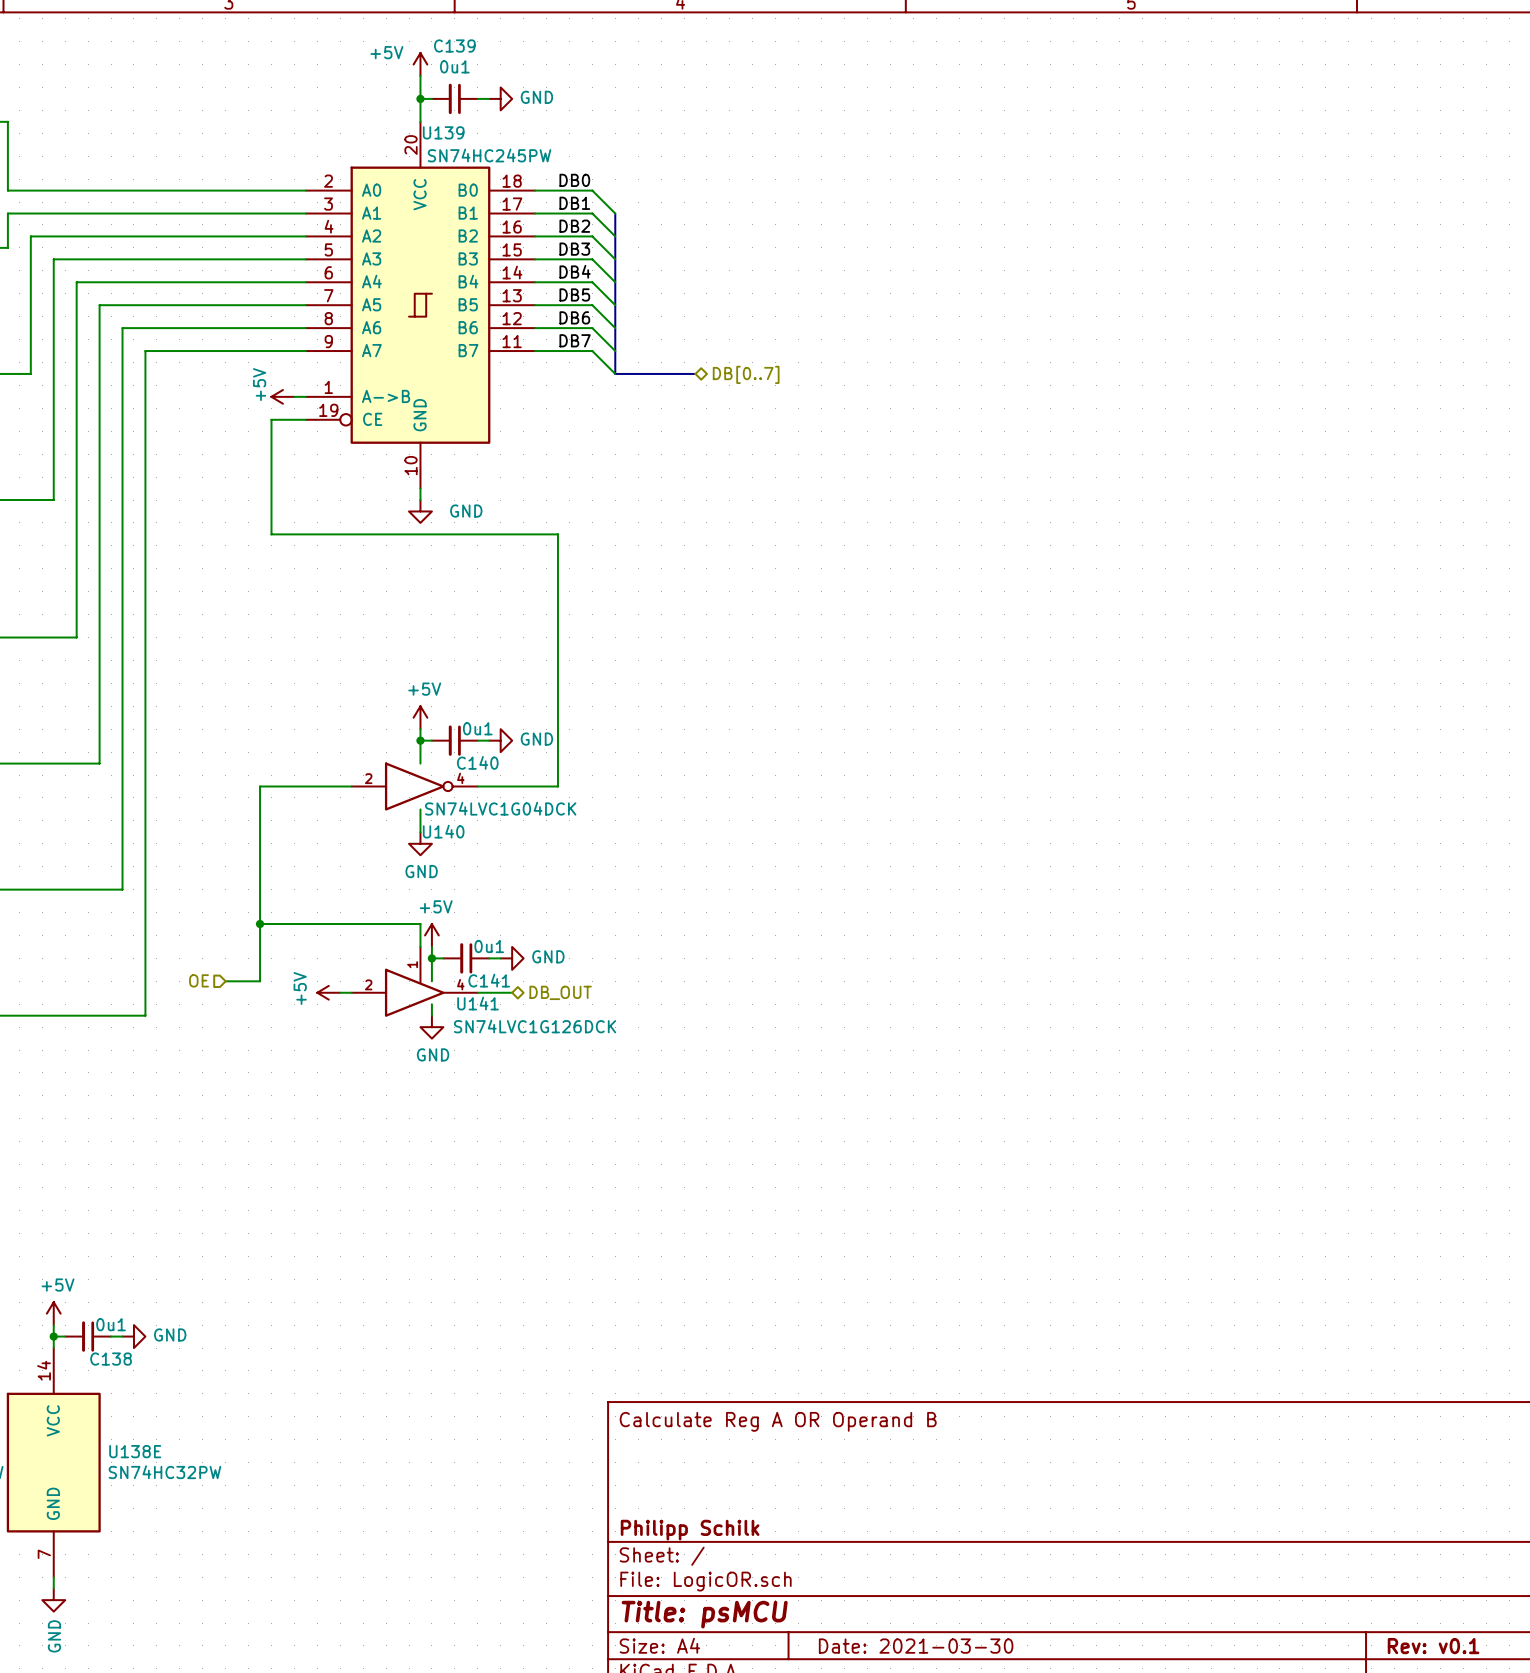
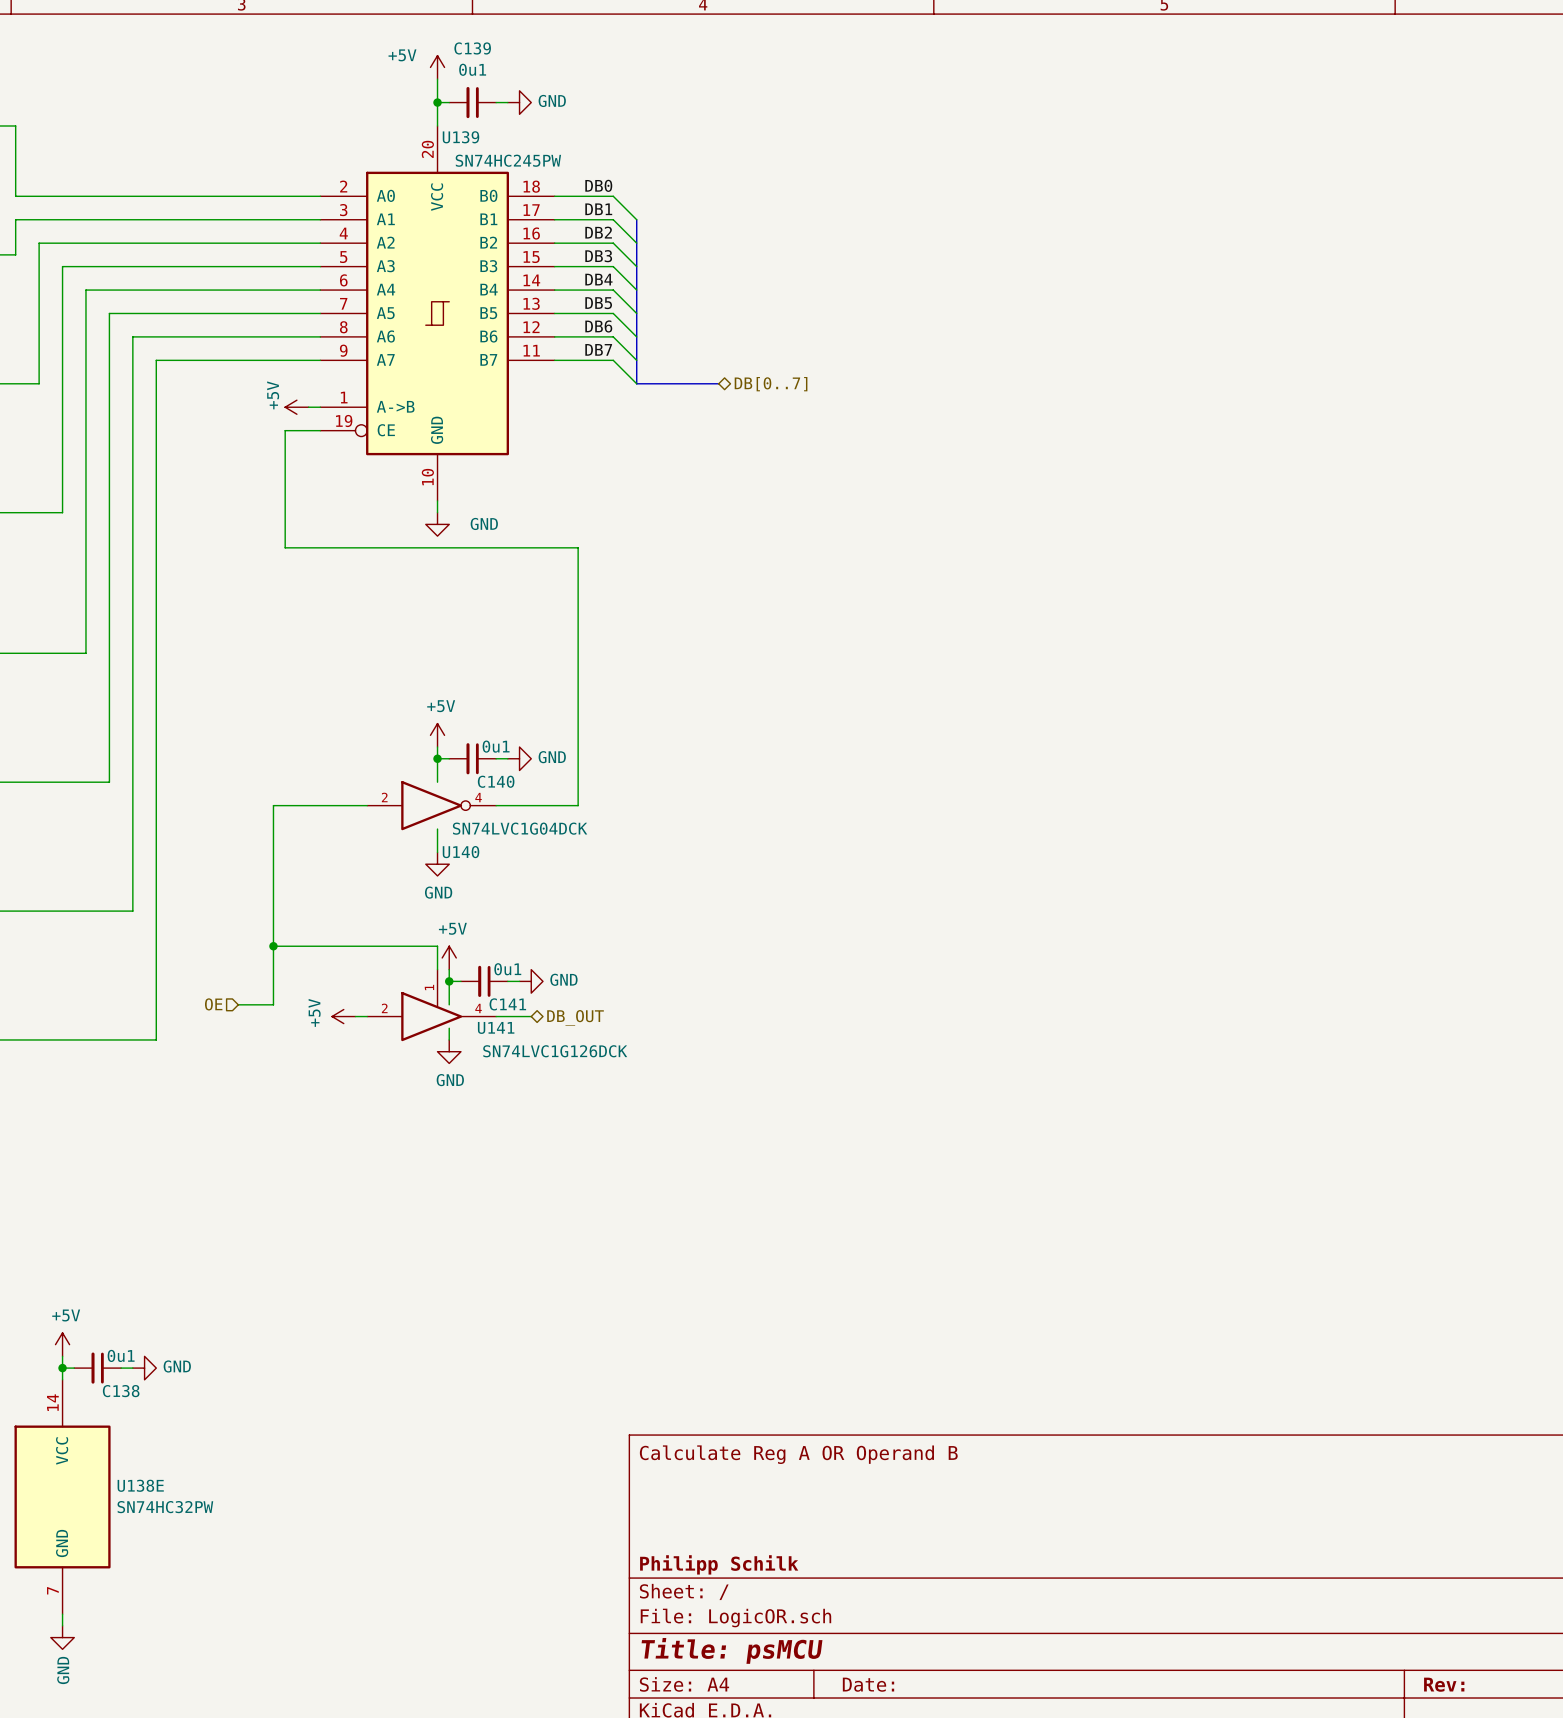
title block: Date: 2021-03-30 (916, 1646) -> Date: (868, 1684)
title block: Rev: v0.1 (1433, 1646) -> Rev: (1444, 1684)

